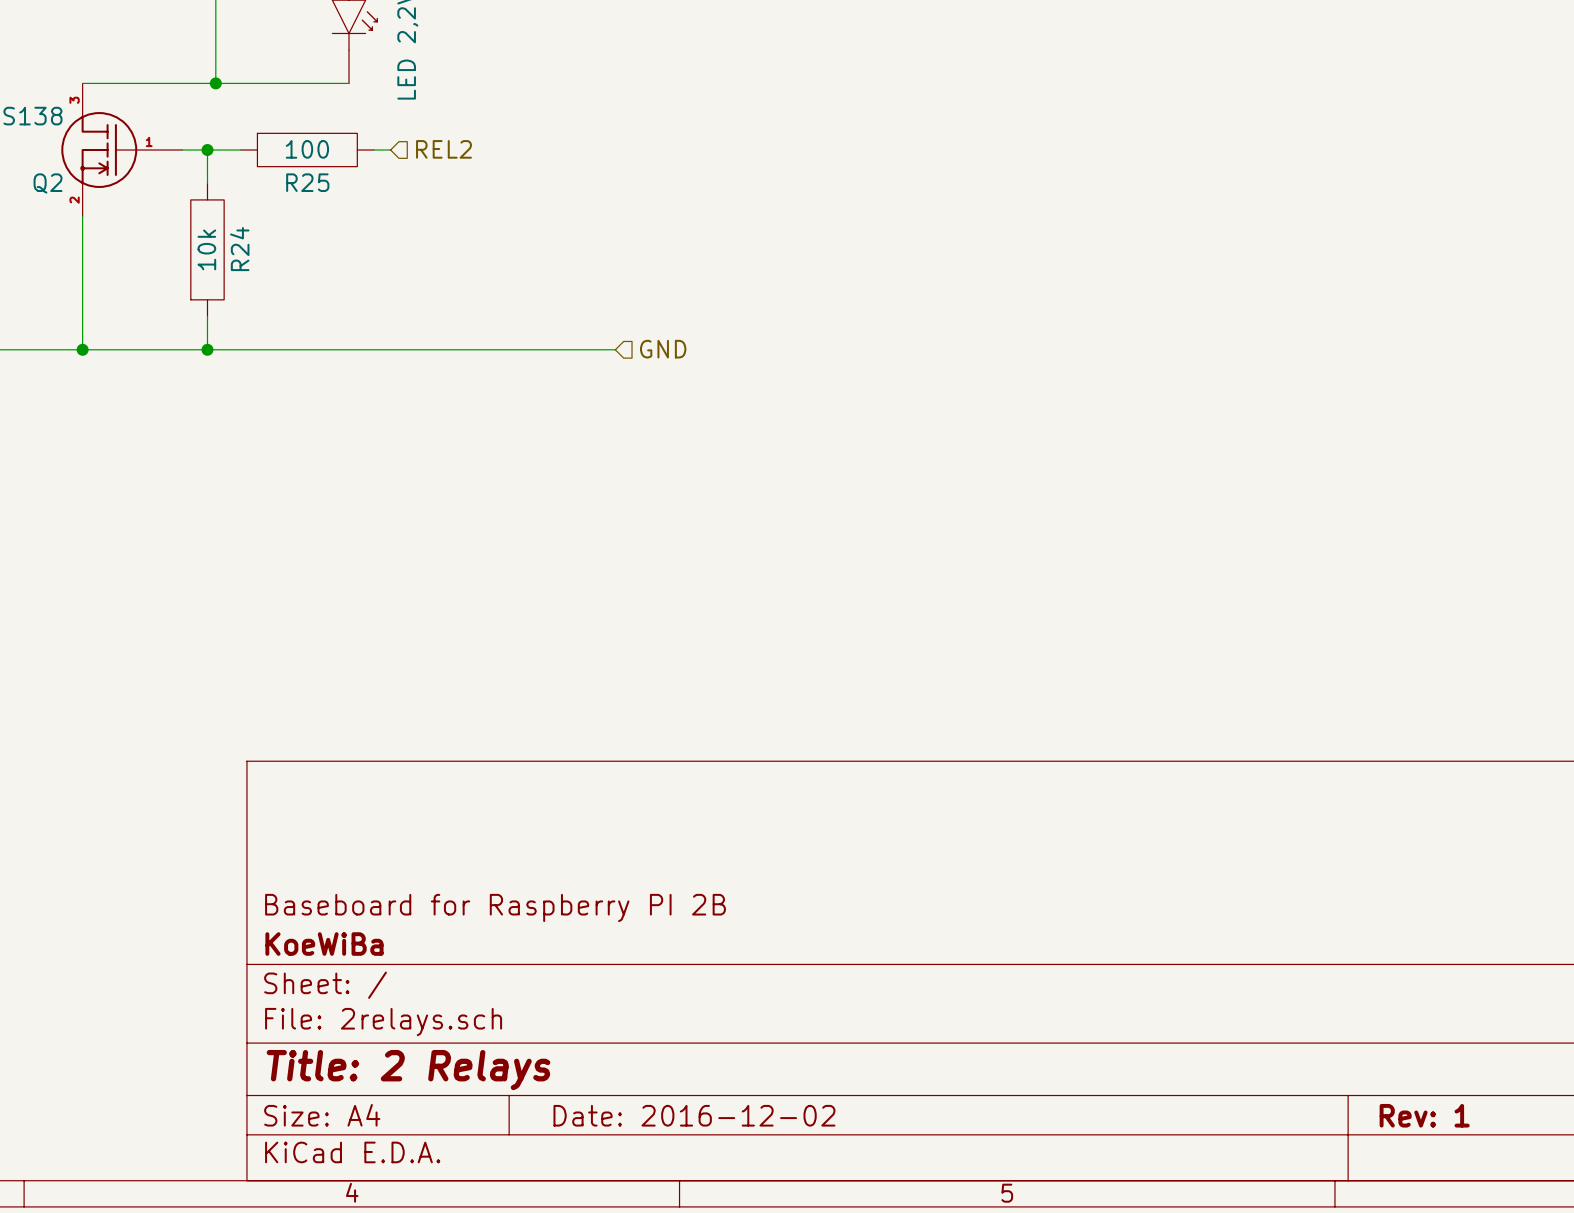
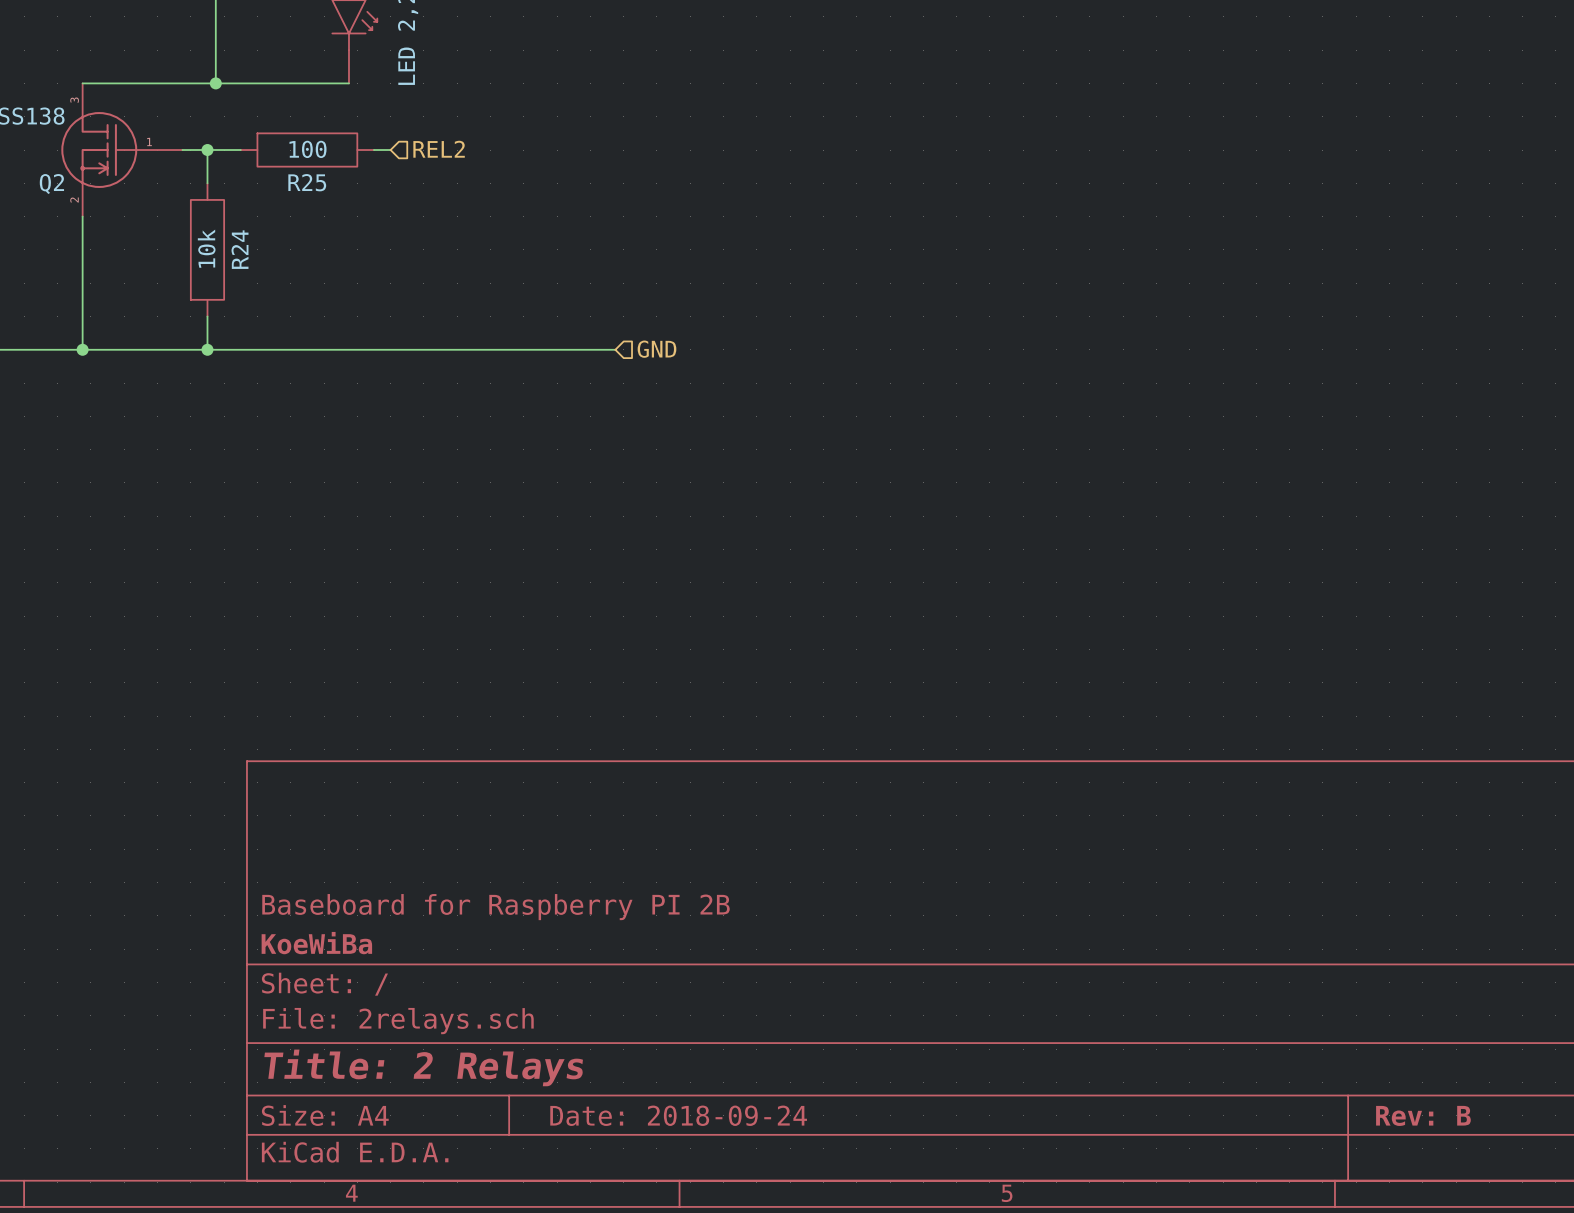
title block: Date: 2016-12-02 (694, 1115) -> Date: 2018-09-24 (678, 1115)
title block: Rev: 1 (1424, 1115) -> Rev: B (1423, 1115)

